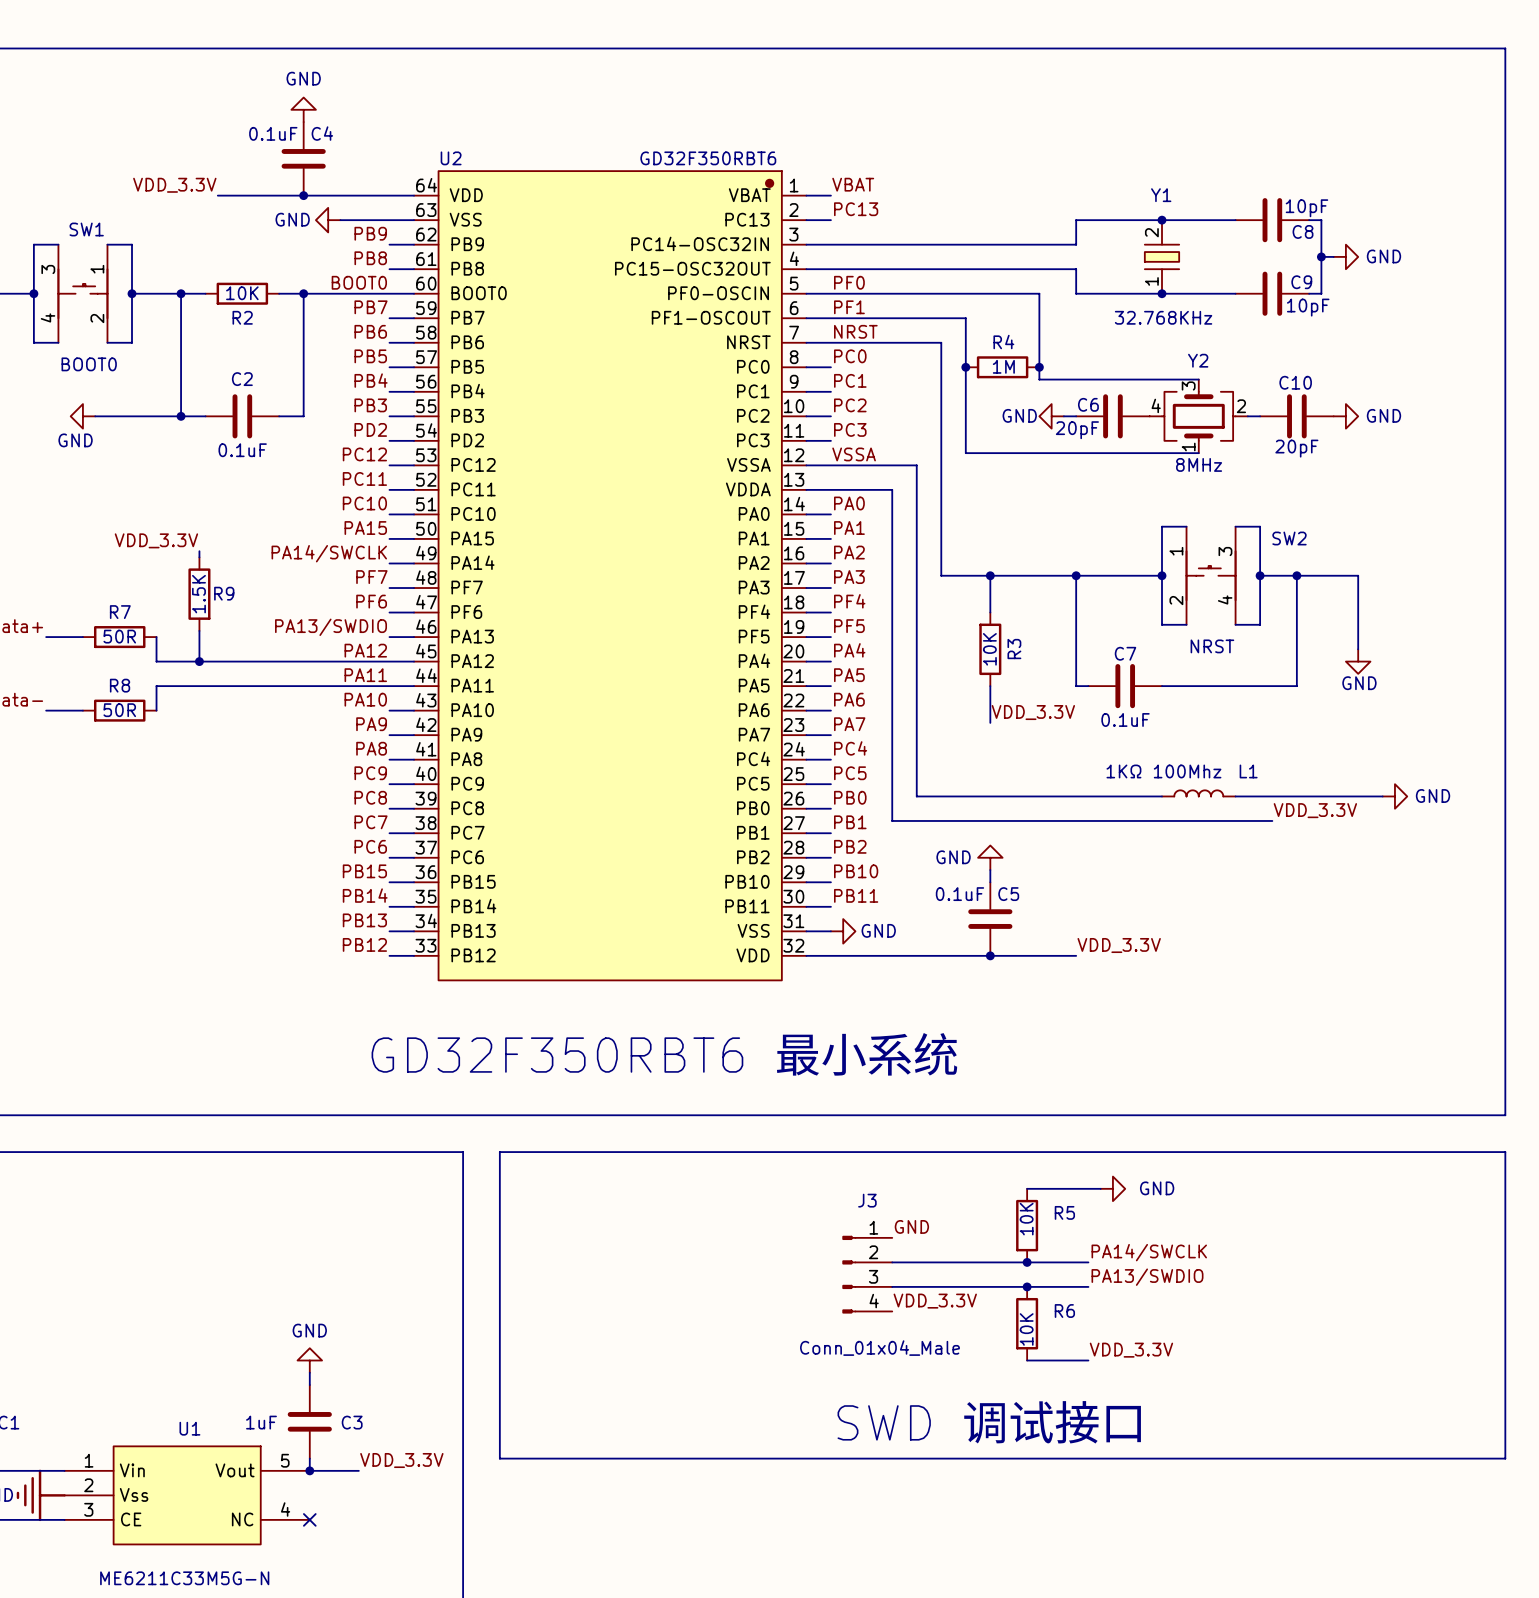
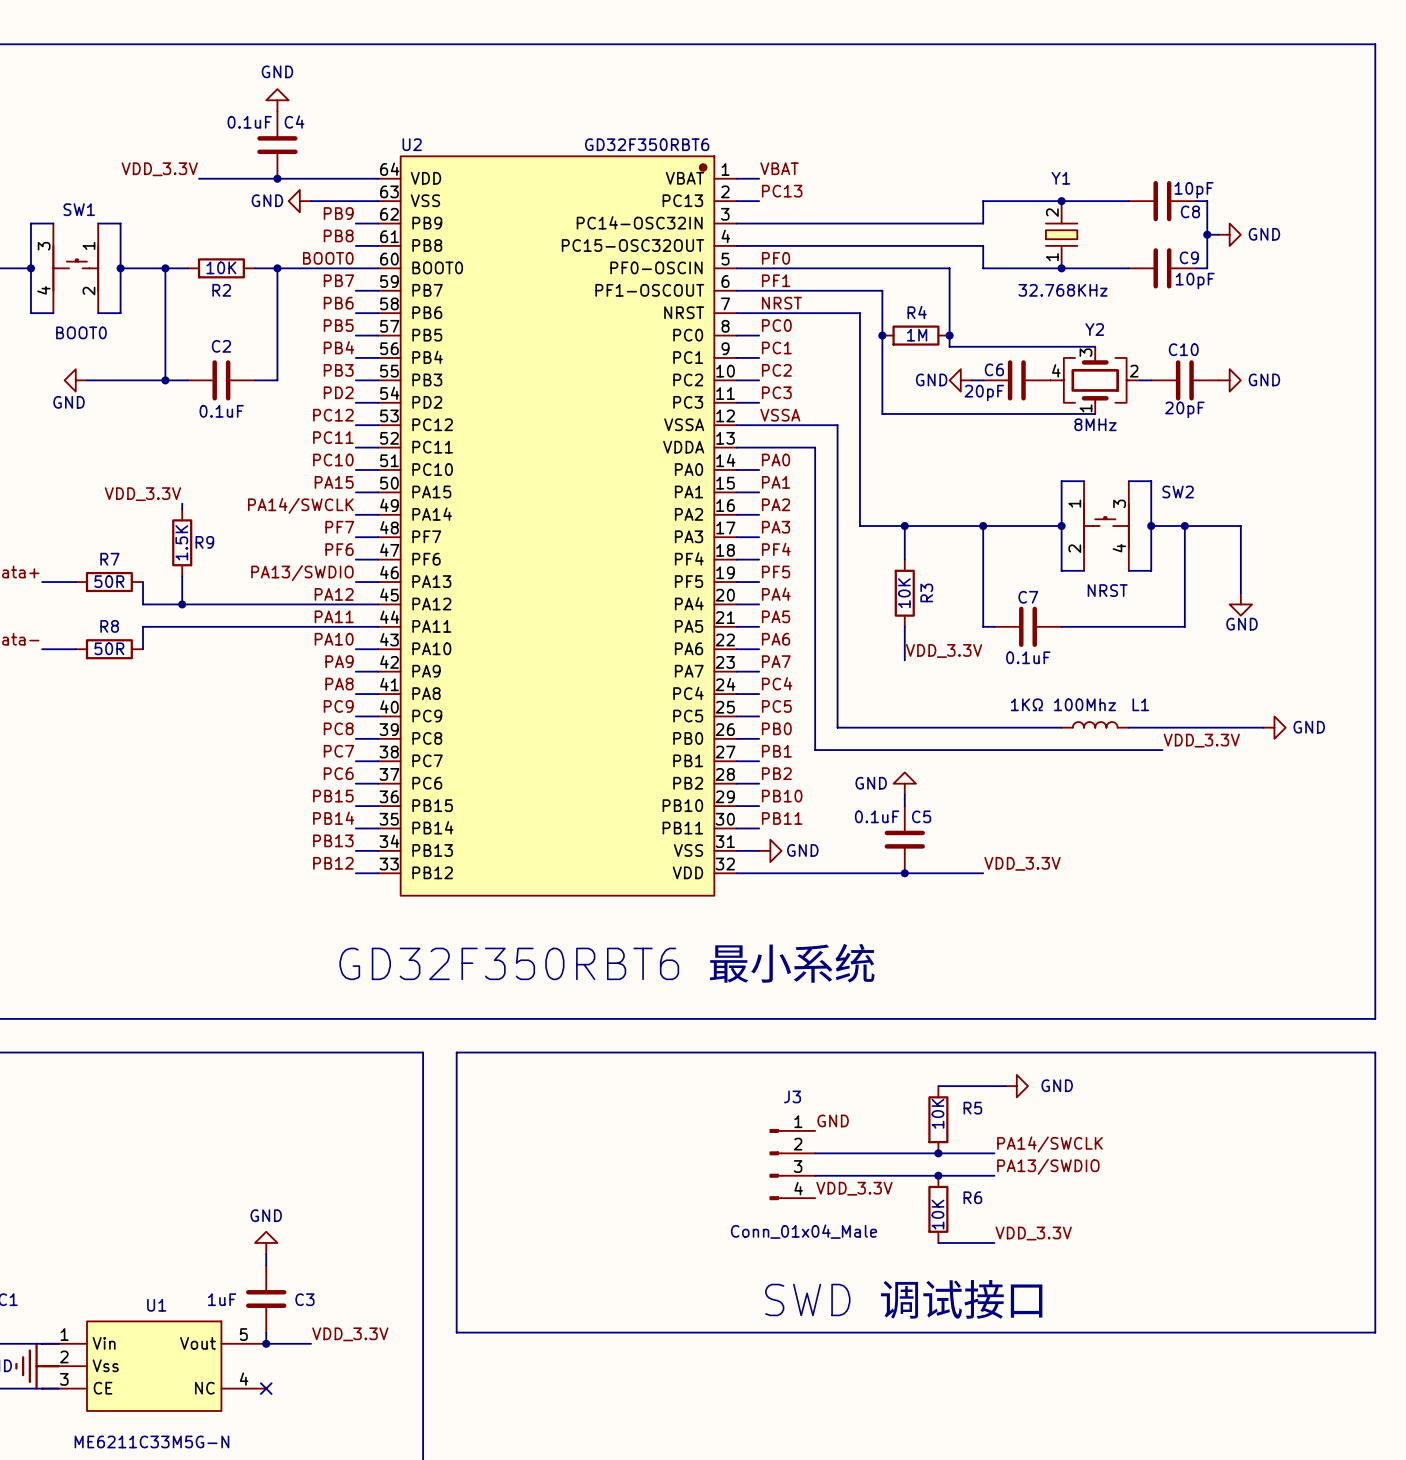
power symbol position: GND (309, 1360) -> GND (266, 1242)
wire: (309, 1372) (309, 1385) -> (266, 1254) (266, 1265)
C3 position: (309, 1421) -> (266, 1298)
label position: VDD_3.3V (401, 1460) -> VDD_3.3V (350, 1334)
junction position: (309, 1470) -> (266, 1343)
wire: (340, 1470) (358, 1470) -> none
U1 position: (187, 1495) -> (154, 1366)
no-connect mark position: (309, 1519) -> (266, 1388)

